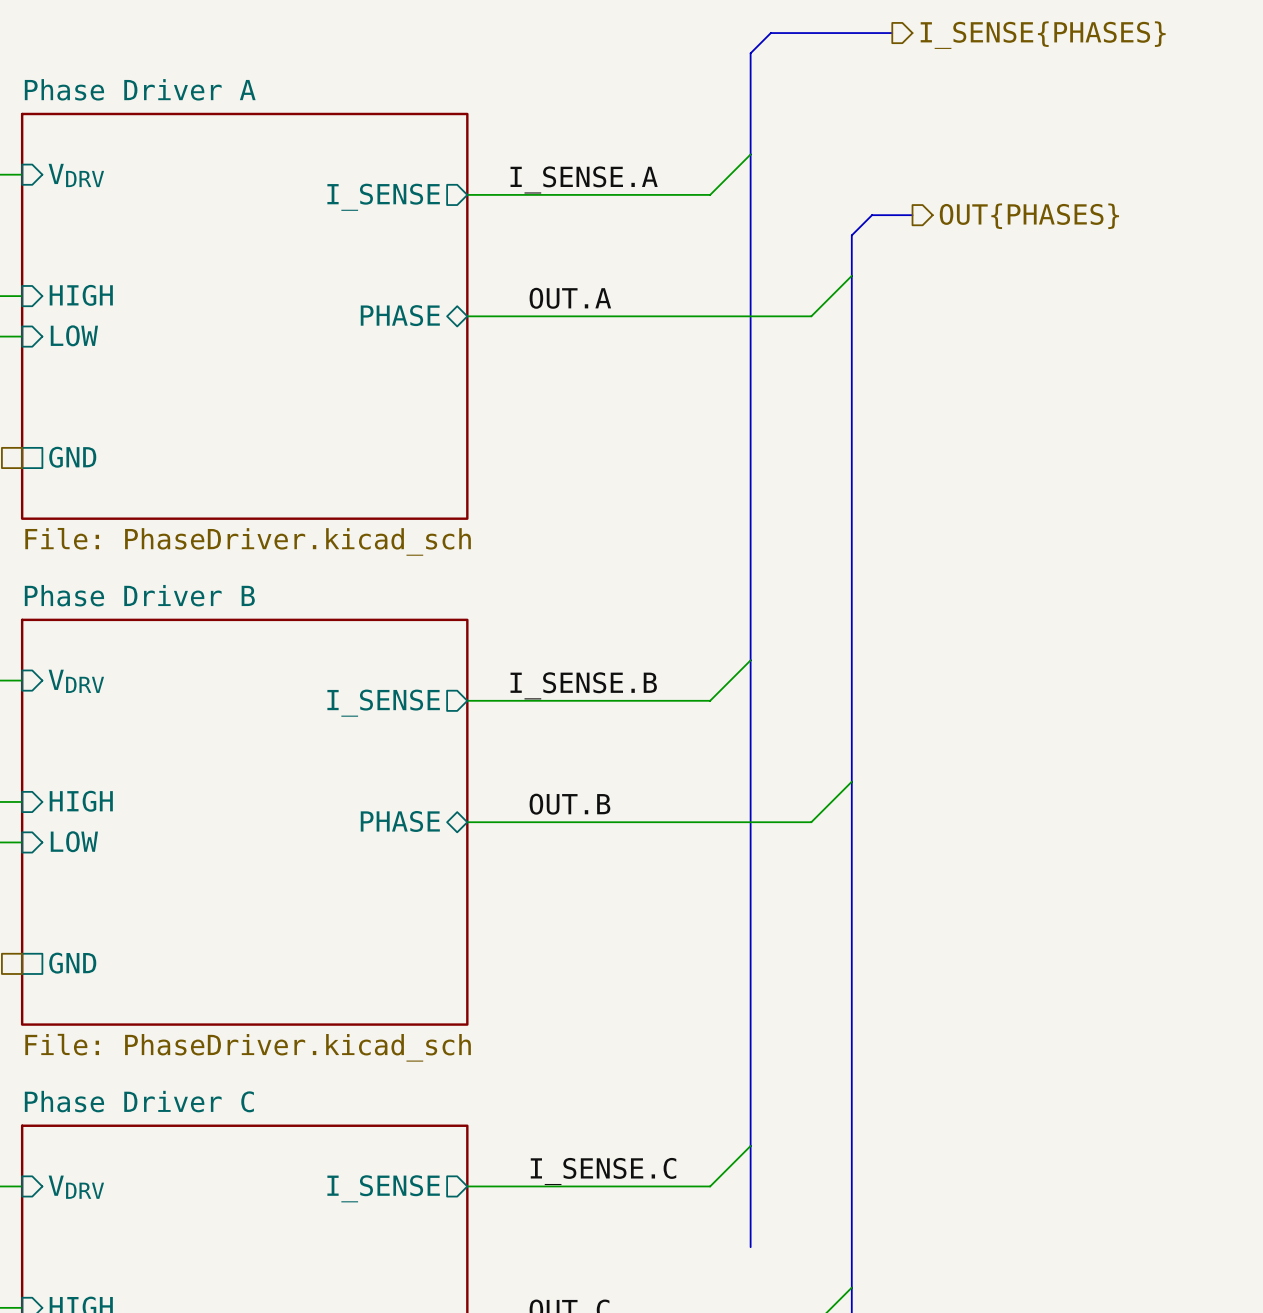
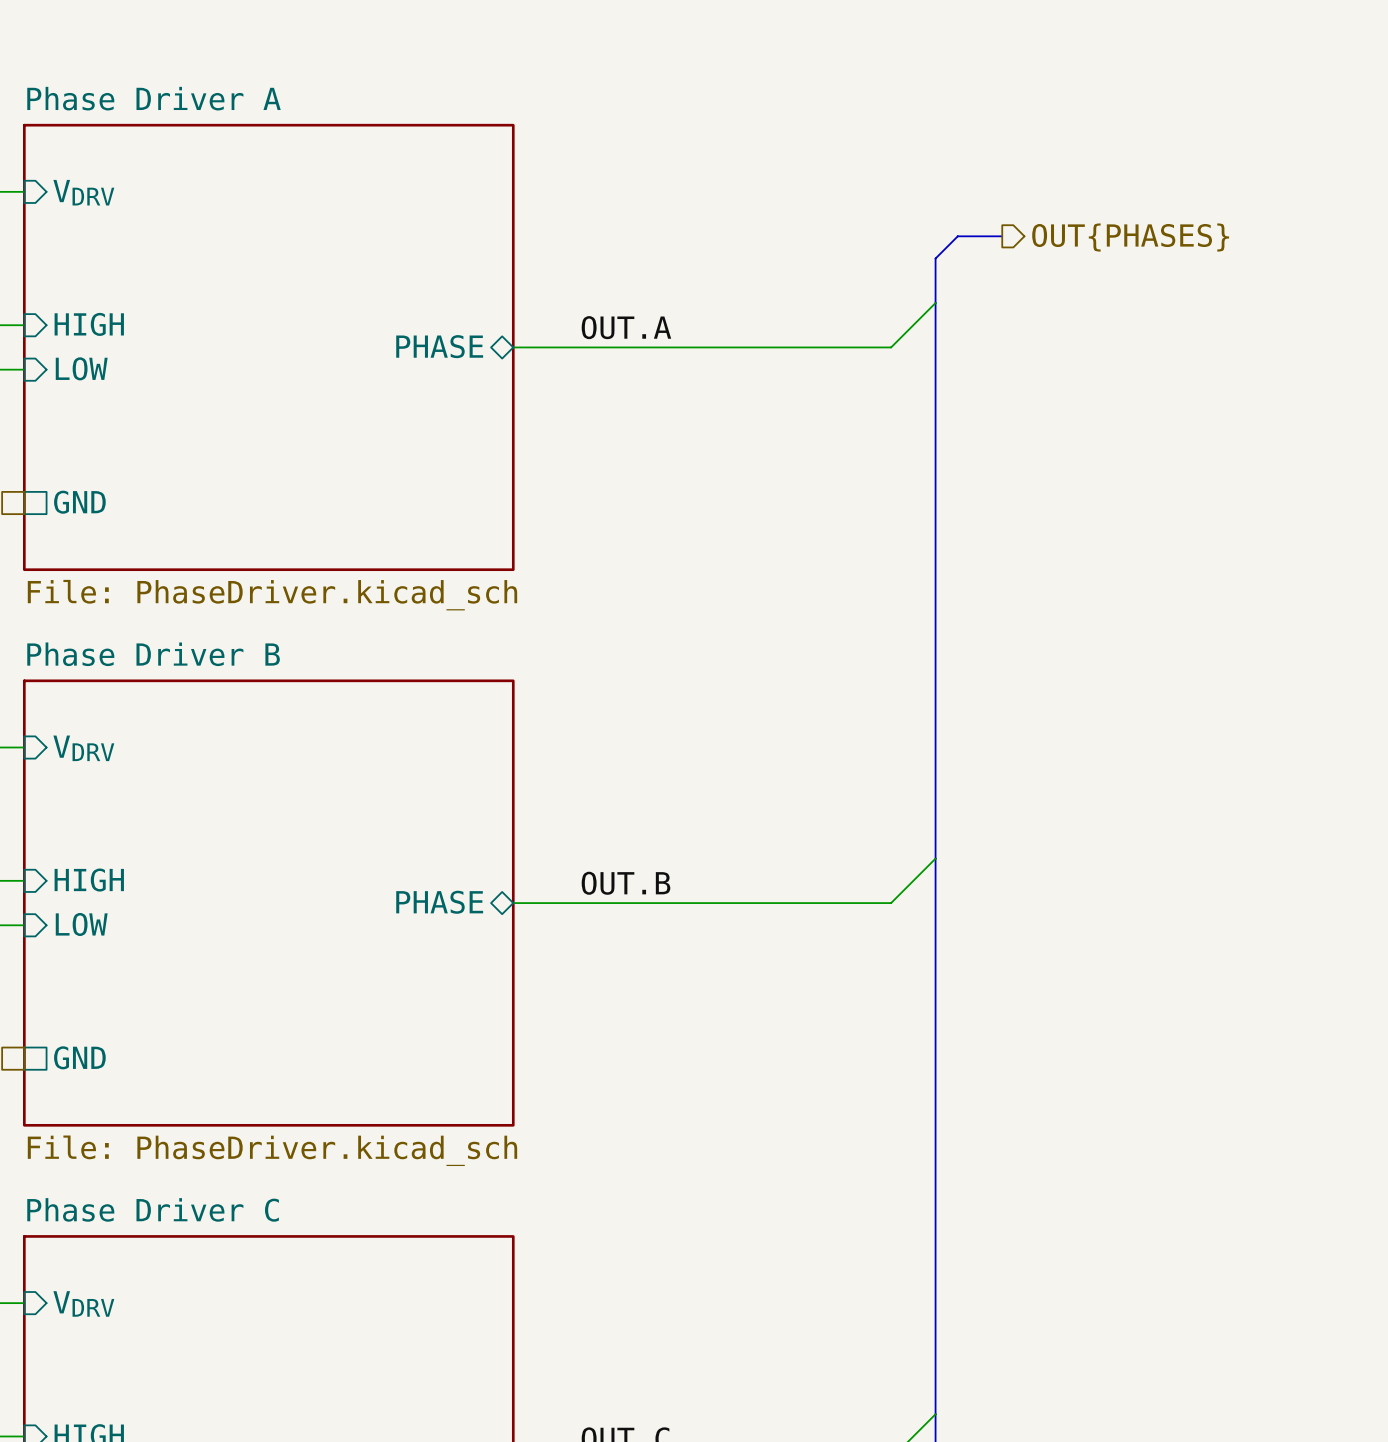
bus: (892, 33) (770, 33) (750, 53) (750, 1247) -> none
hierarchical label: I_SENSE{PHASES} (1043, 35) -> none
wire: (750, 154) (710, 194) (467, 194) -> none
label: I_SENSE.A (584, 179) -> none
sheet pin: I_SENSE (383, 197) -> none
wire: (750, 660) (710, 700) (467, 700) -> none
label: I_SENSE.B (583, 685) -> none
sheet pin: I_SENSE (383, 703) -> none
wire: (750, 1145) (710, 1186) (467, 1186) -> none
label: I_SENSE.C (603, 1171) -> none
sheet pin: I_SENSE (383, 1188) -> none

